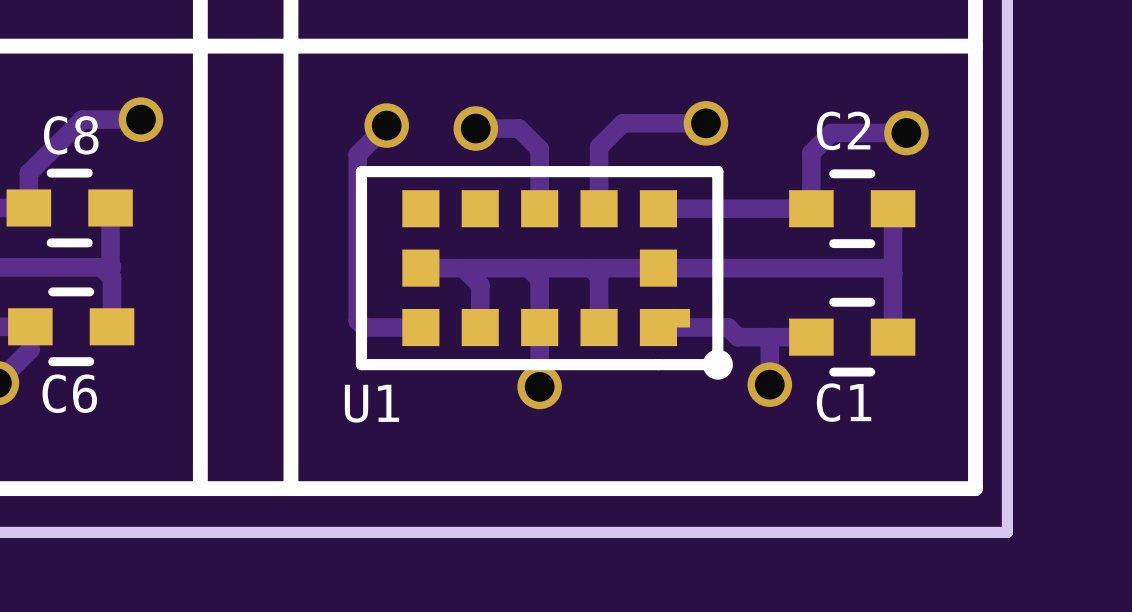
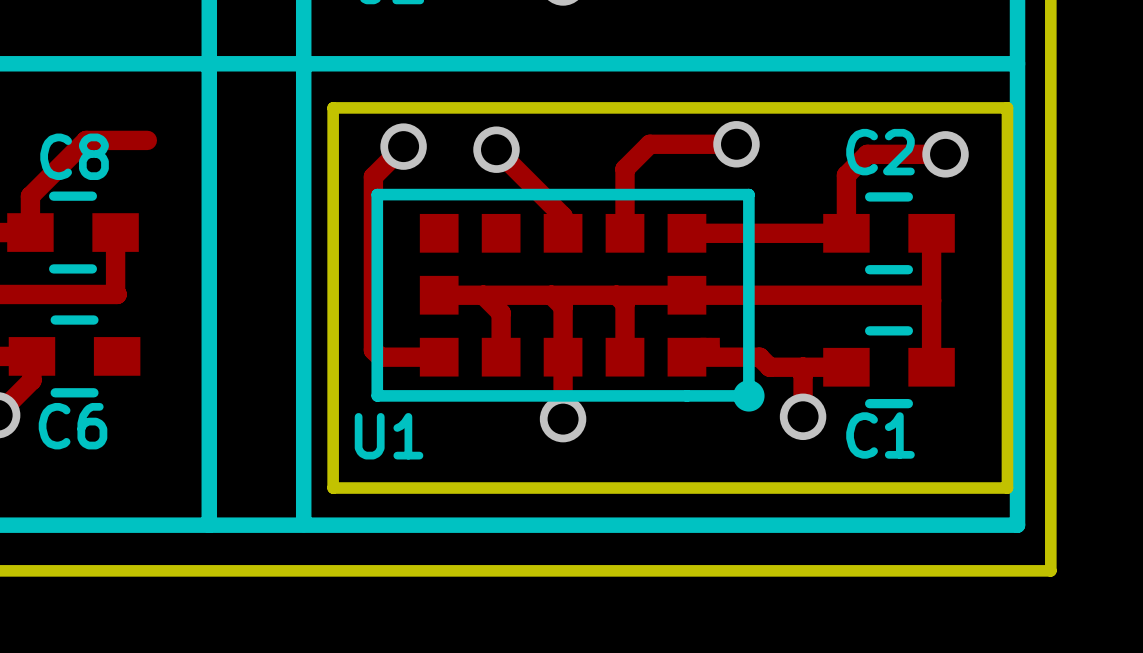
board edge: none -> (333, 107) (333, 488) (1007, 488) (1007, 107) (333, 107)
via: (140, 119) -> none
track: (475, 128) (518, 128) (539, 149) (539, 192) -> (496, 149) (563, 216)
track: (101, 267) (112, 277) (112, 326) -> none

